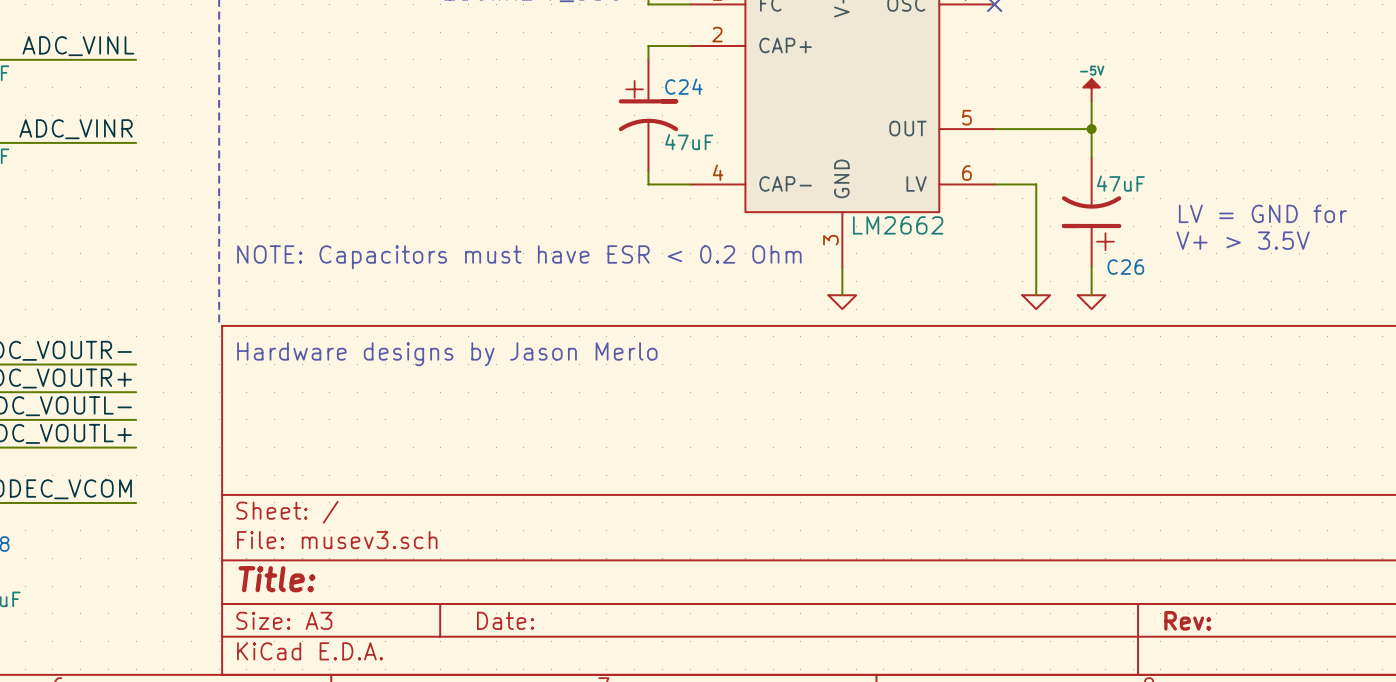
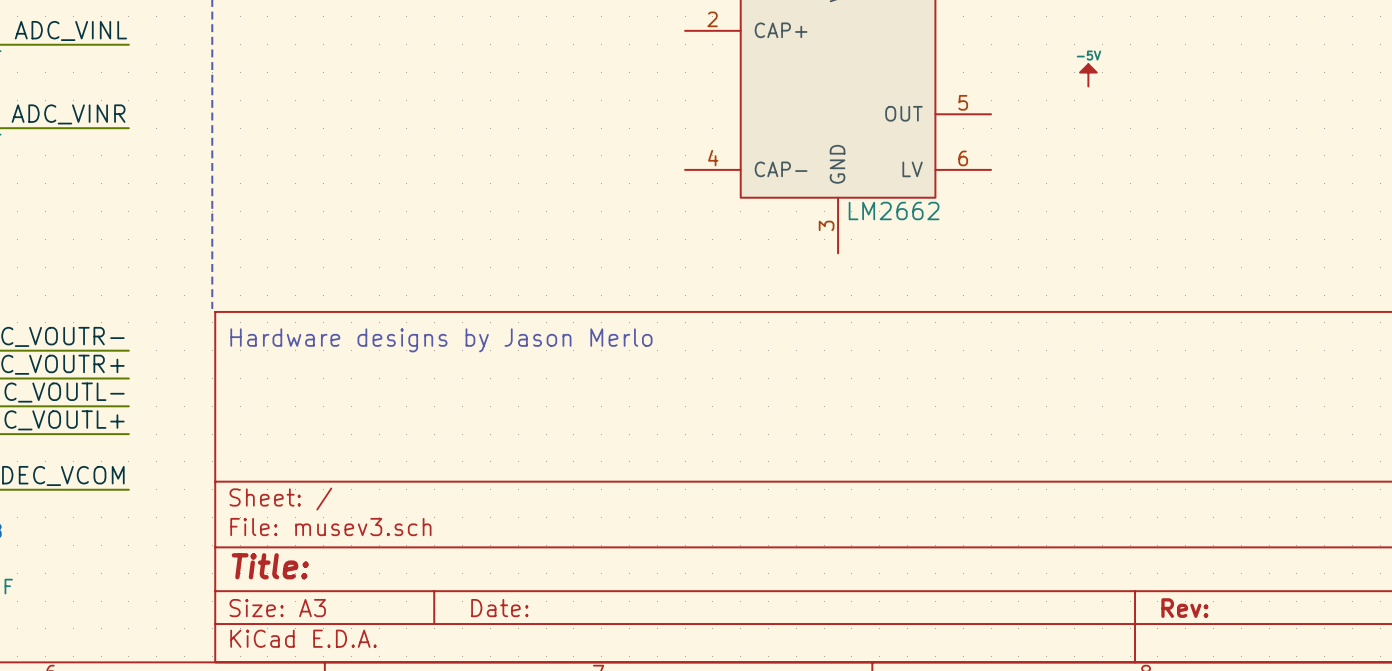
wire: (690, 45) (648, 45) (648, 59) -> none
wire: (1091, 101) (1091, 156) -> none
C24: 47uF (648, 115) -> none
wire: (994, 129) (1091, 129) -> none
junction: (1091, 129) -> none
wire: (648, 170) (648, 184) (690, 184) -> none
wire: (994, 184) (1036, 184) (1036, 295) -> none
C26: 47uF (1091, 212) -> none
text: LV = GND for (1262, 213) -> none
text: V+ > 3.5V (1243, 240) -> none
text: NOTE: Capacitors must have ESR < 0.2 Ohm (519, 257) -> none
wire: (842, 267) (842, 295) -> none
wire: (1091, 267) (1091, 295) -> none
power symbol: (842, 302) -> none
power symbol: (1036, 302) -> none
power symbol: (1091, 302) -> none

